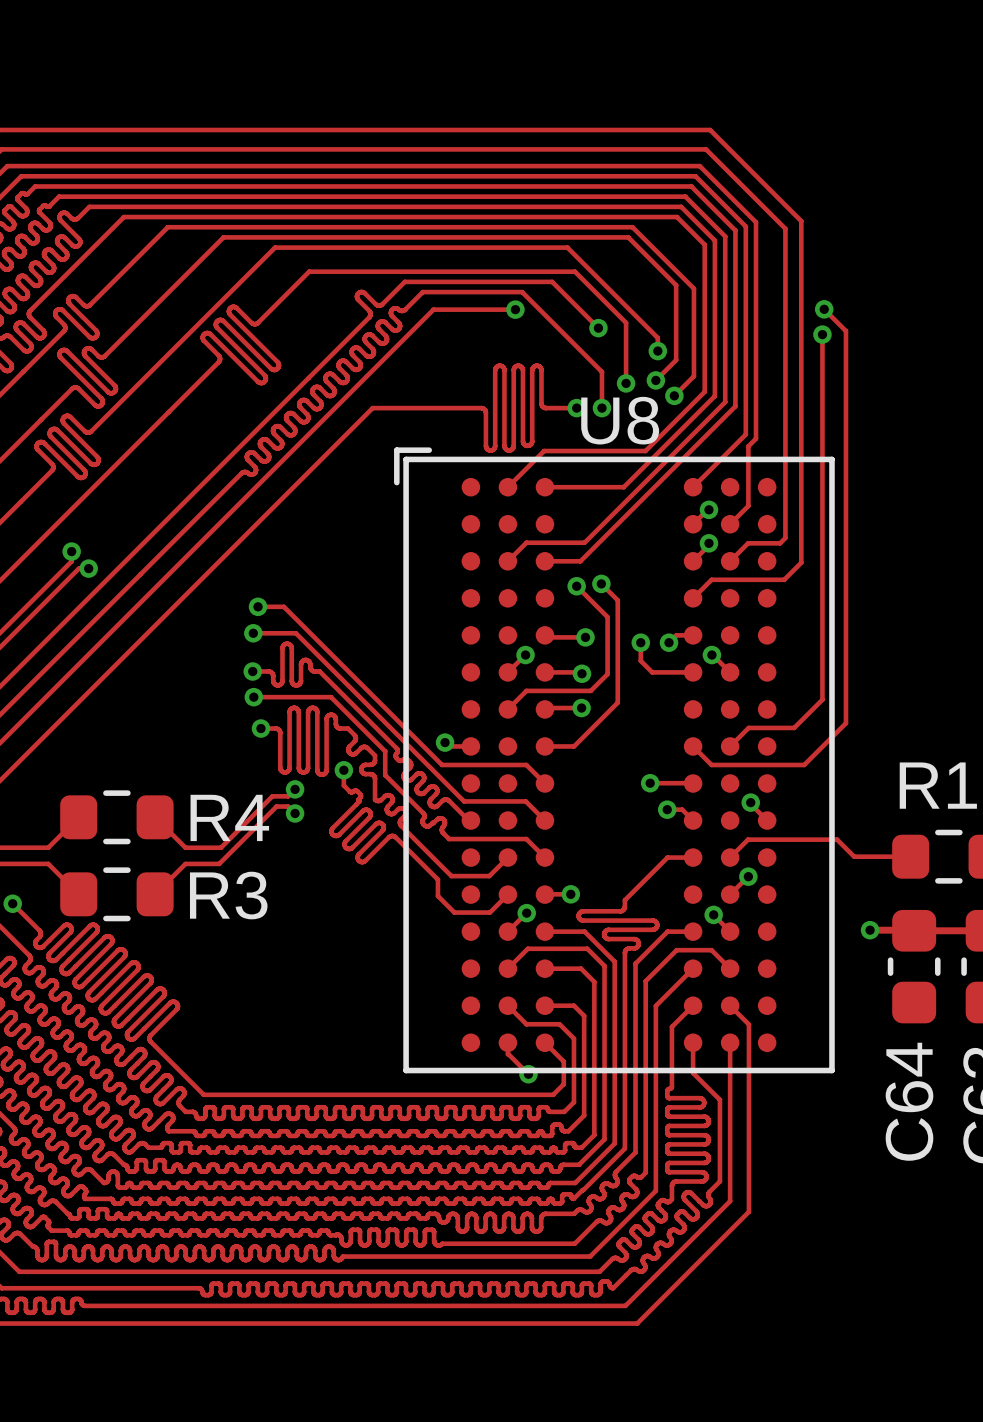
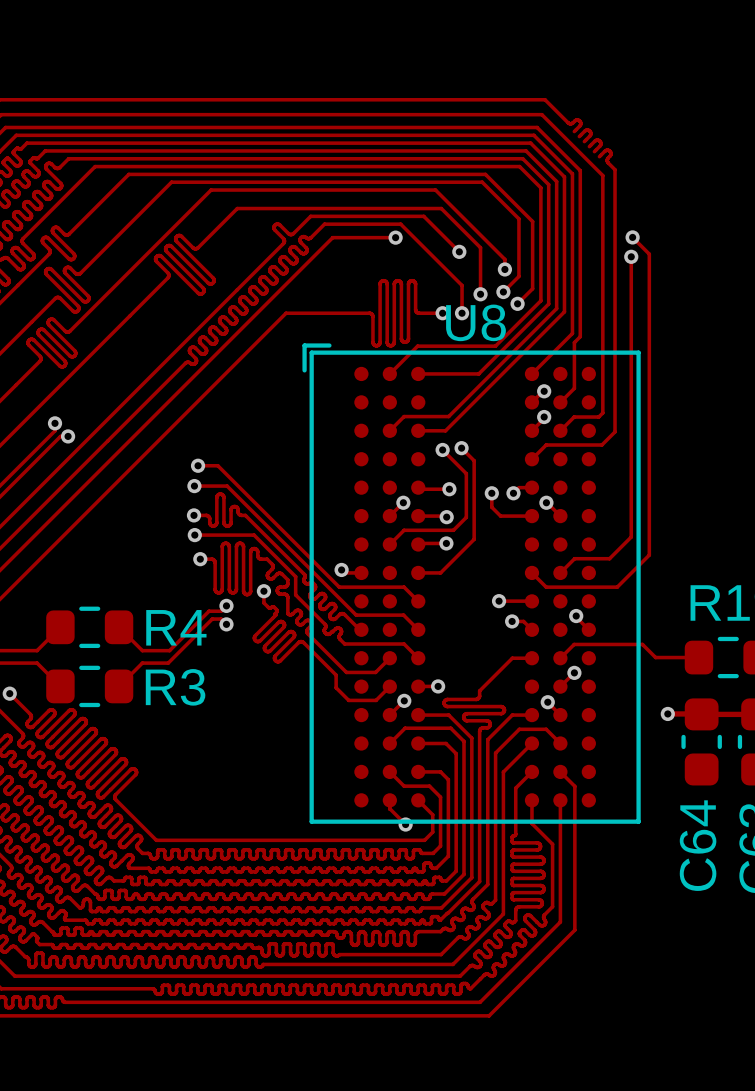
track: (740, 159) (792, 212) -> (568, 122) (571, 123) (576, 120) (580, 121) (580, 125) (574, 131)
track: none -> (579, 136) (585, 130) (589, 131) (590, 135) (584, 141)
track: none -> (589, 146) (595, 140) (599, 141) (600, 145) (594, 151)
track: none -> (599, 156) (605, 150) (609, 150) (610, 154) (607, 159) (608, 162)

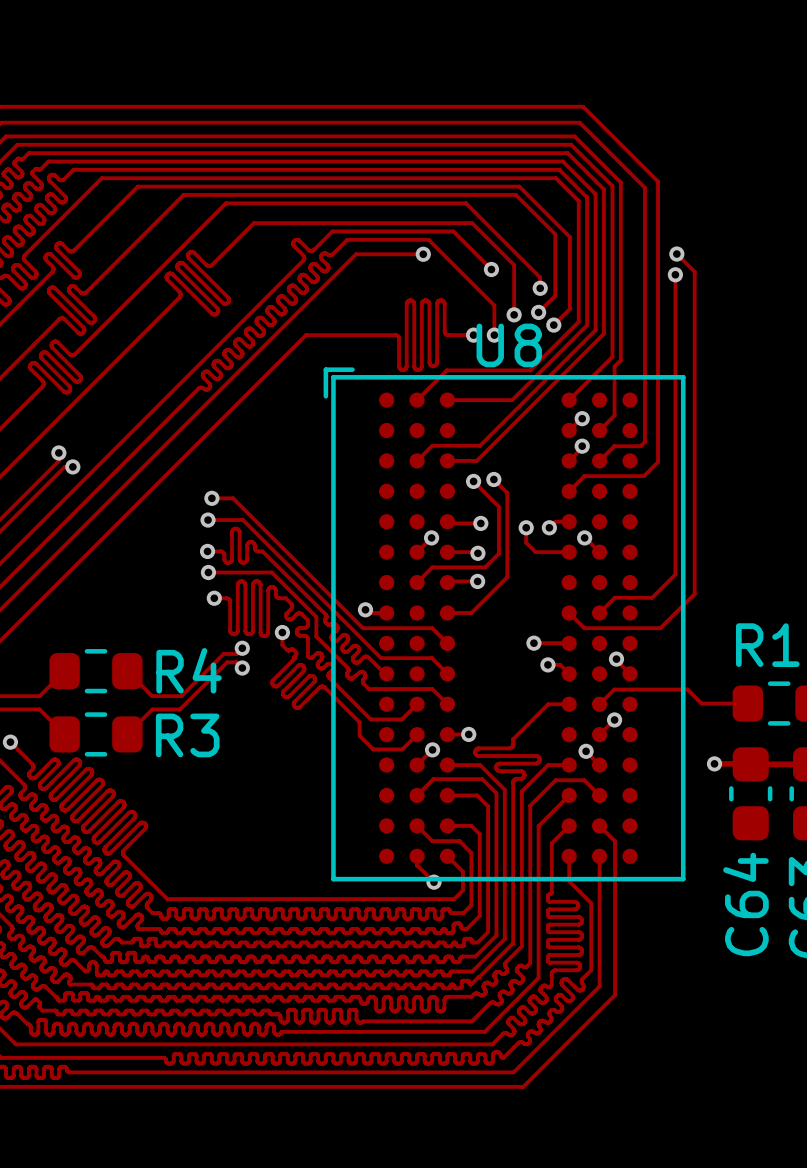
track: (568, 122) (571, 123) (576, 120) (580, 121) (580, 125) (574, 131) -> (607, 131) (650, 174)
track: (579, 136) (585, 130) (589, 131) (590, 135) (584, 141) -> none
track: (589, 146) (595, 140) (599, 141) (600, 145) (594, 151) -> none
track: (599, 156) (605, 150) (609, 150) (610, 154) (607, 159) (608, 162) -> none

